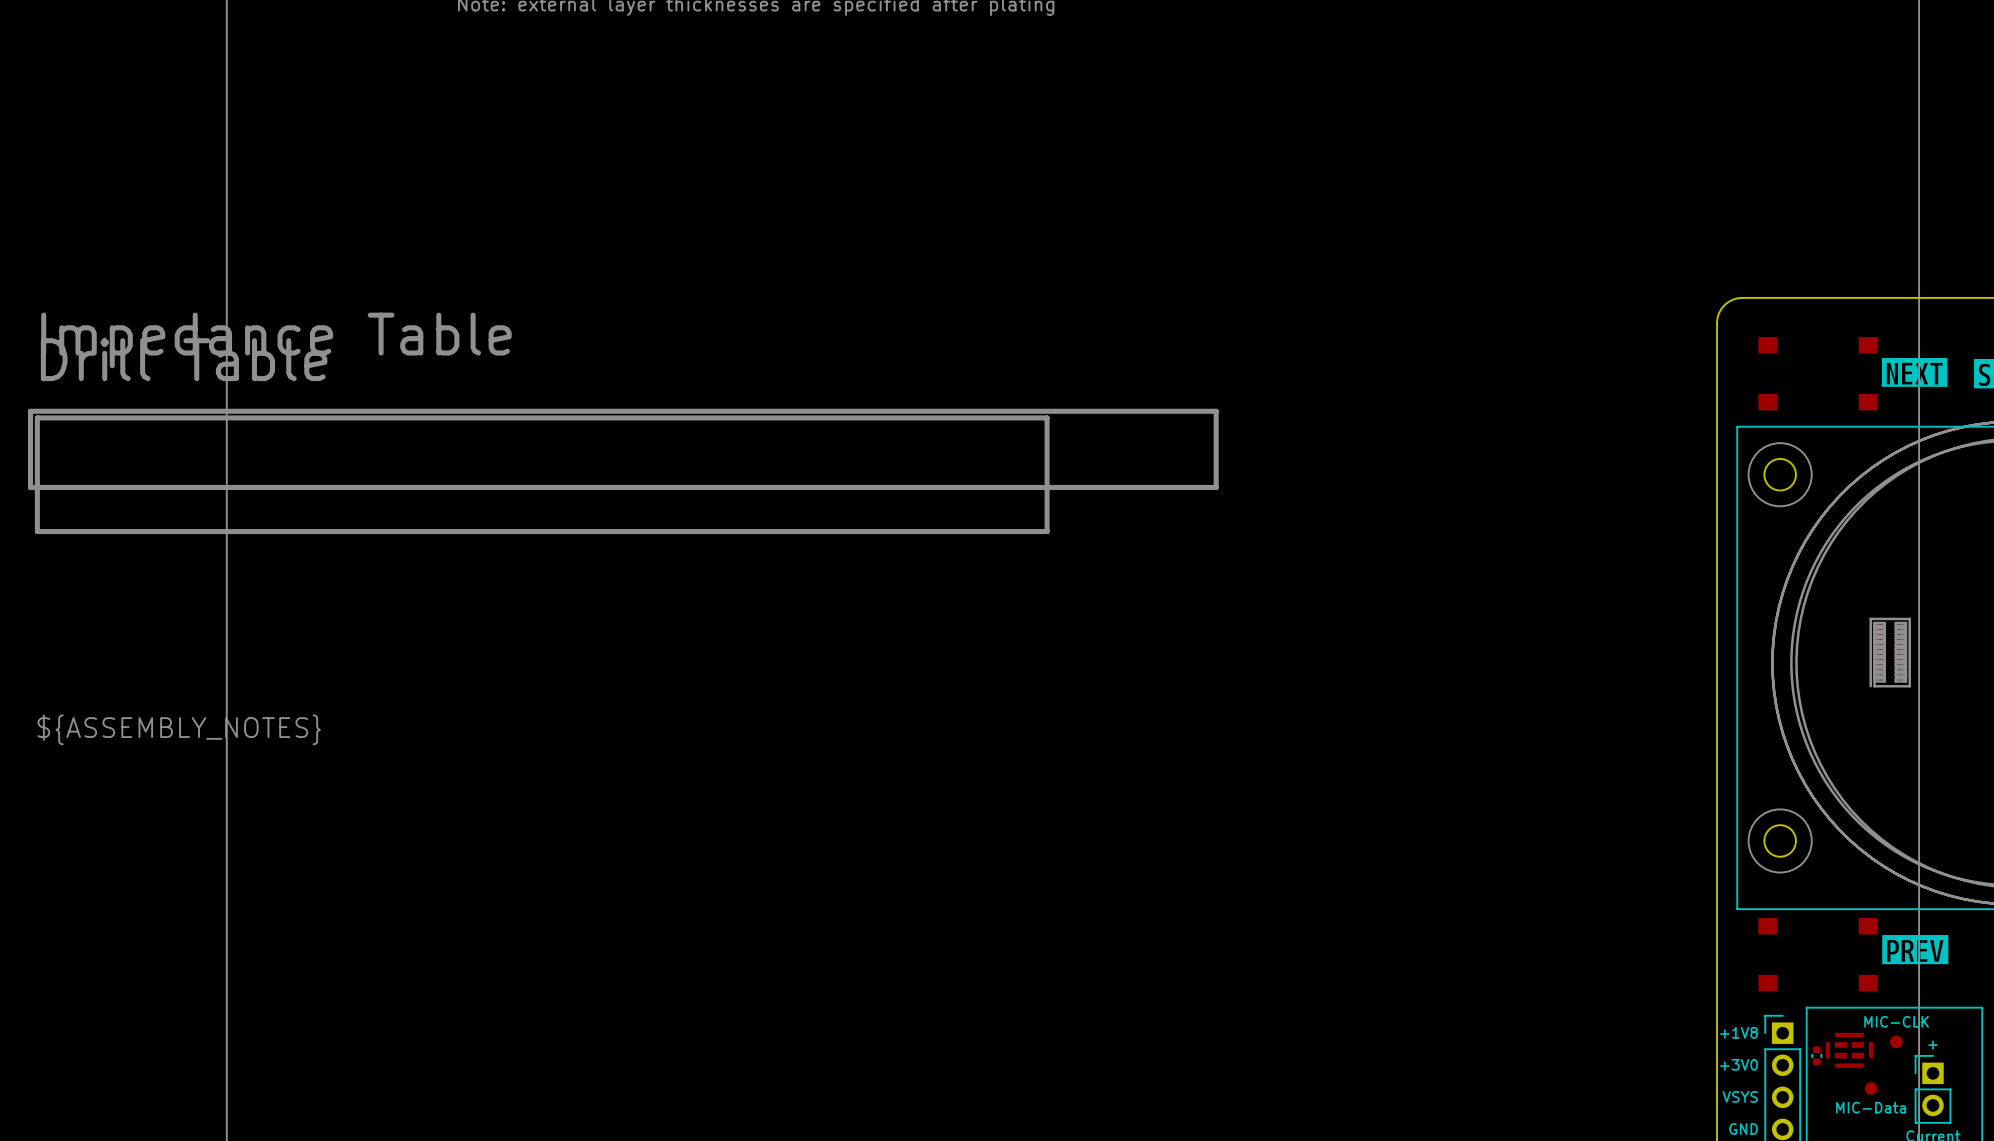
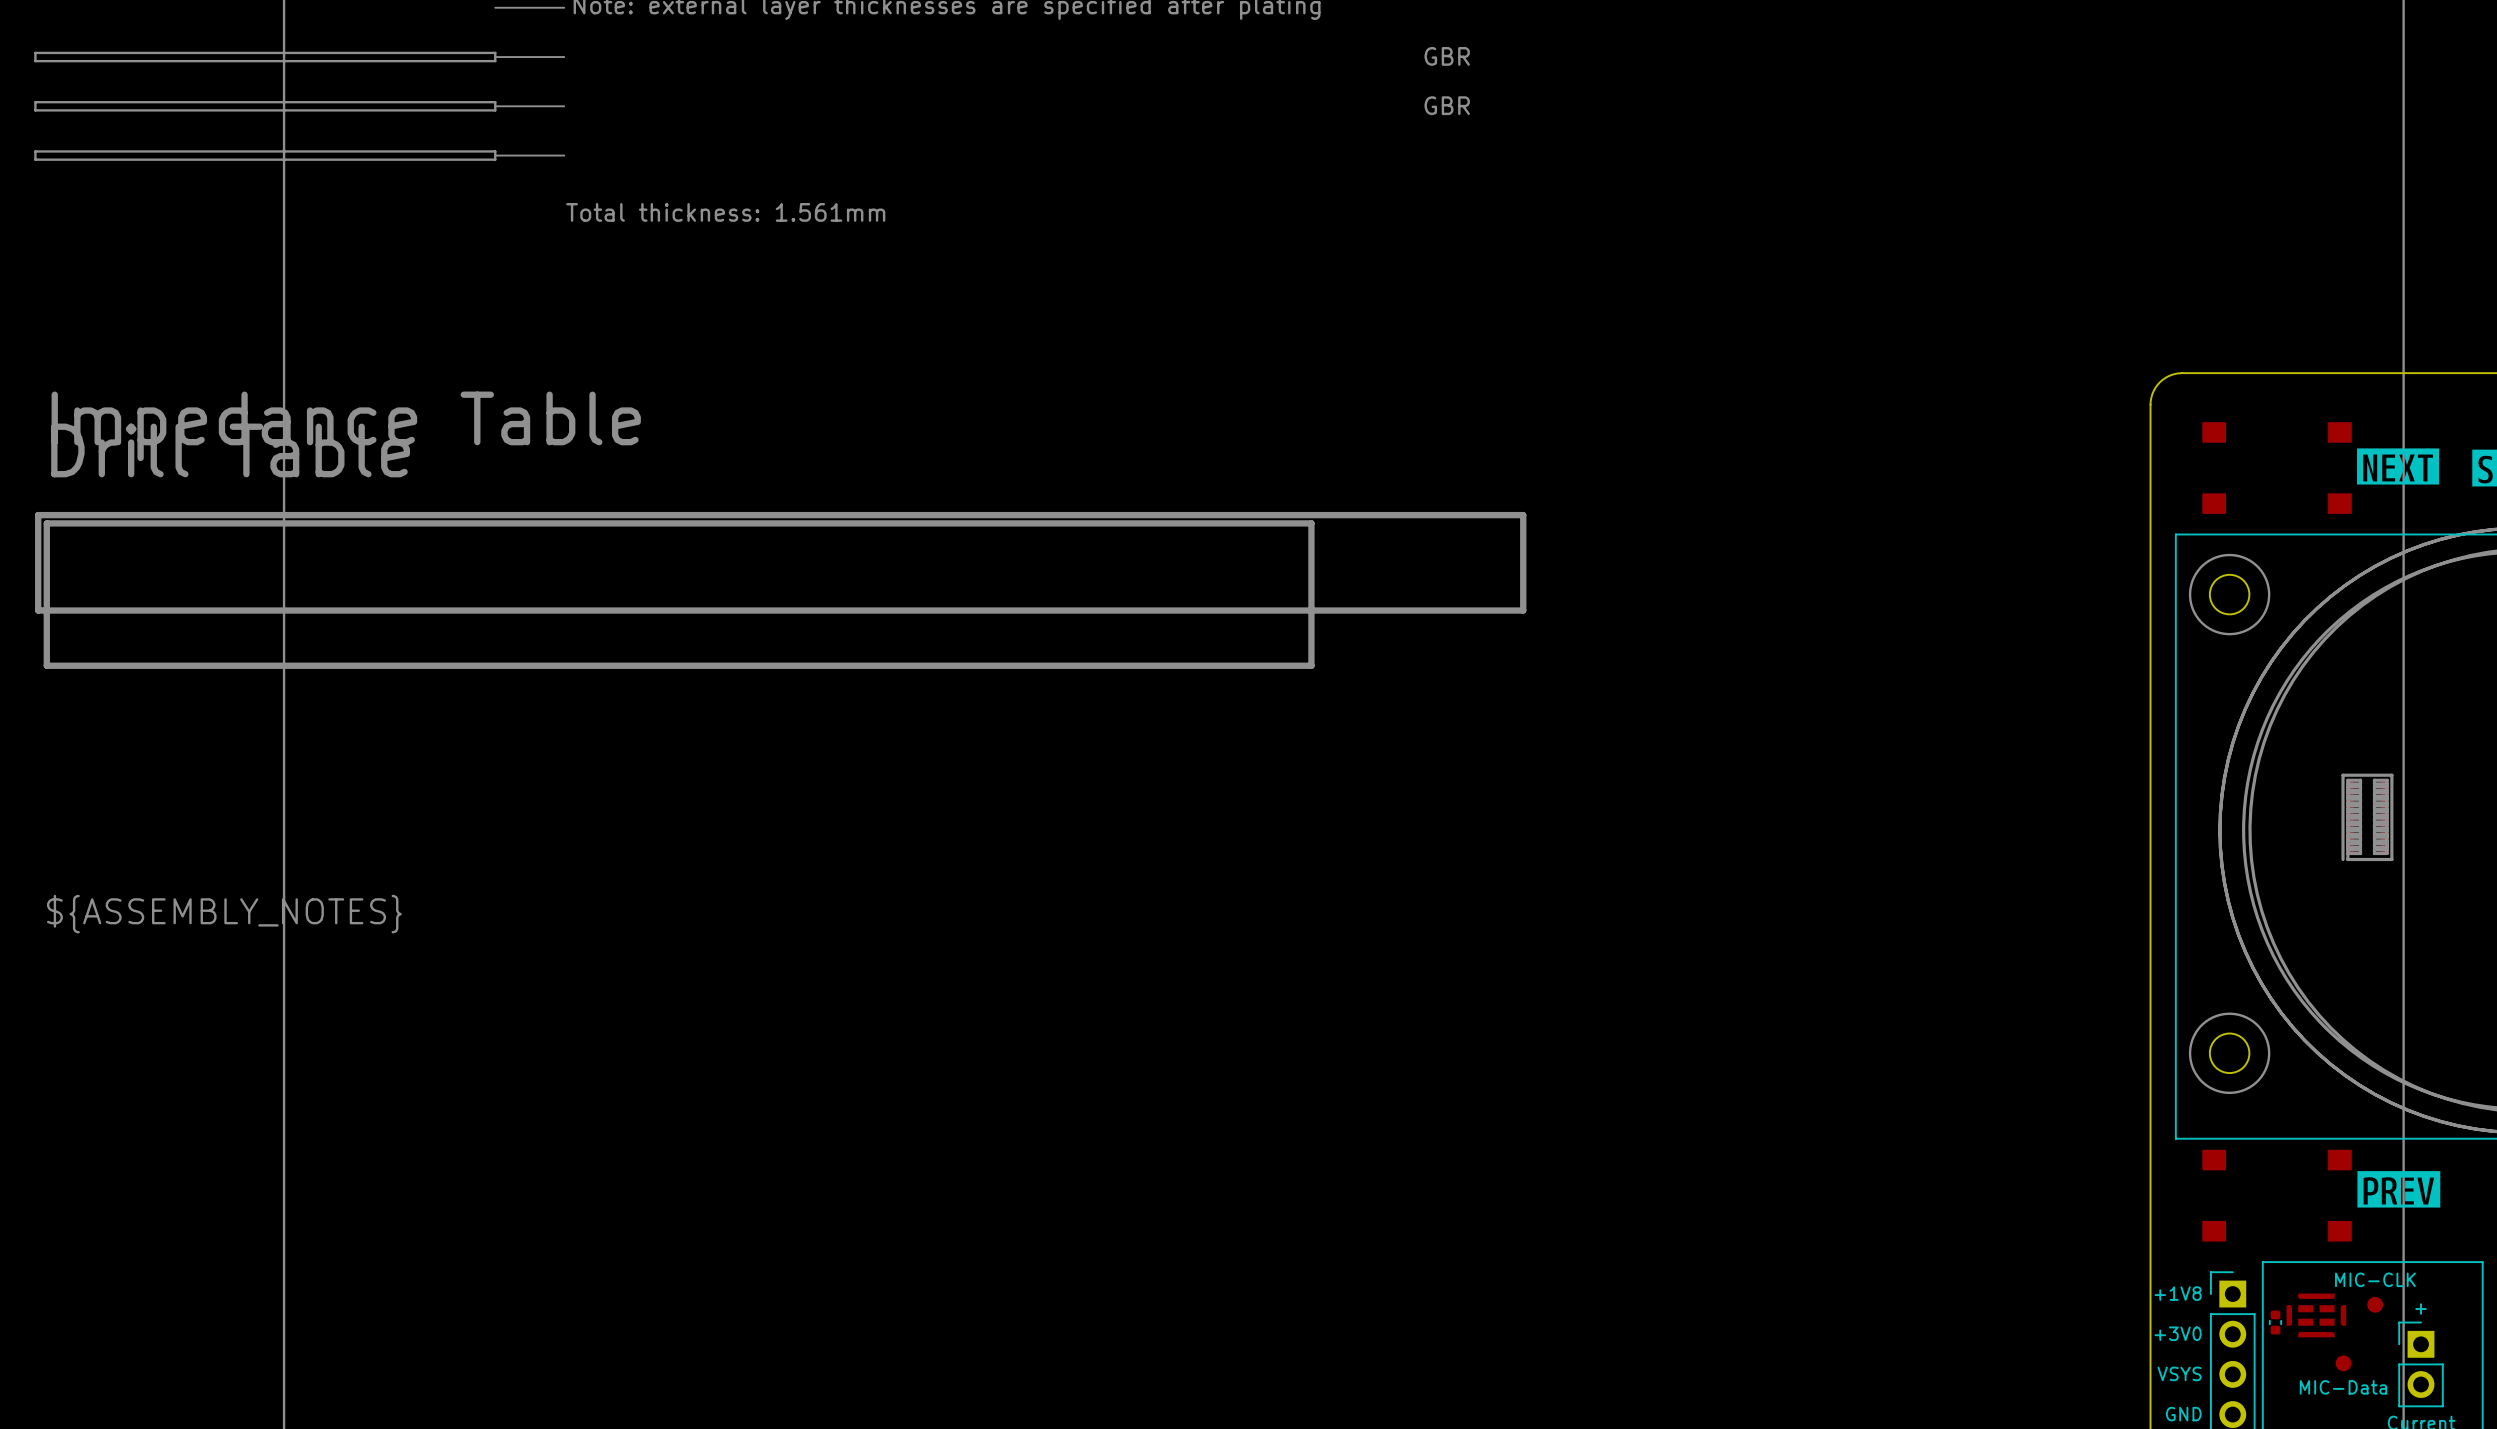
line: none -> (495, 7) (564, 7)
line: none -> (35, 52) (35, 61) (495, 61) (495, 52) (35, 52)
line: none -> (495, 57) (564, 57)
text: none -> GBR (1447, 56)
line: none -> (35, 102) (35, 110) (495, 110) (495, 102) (35, 102)
line: none -> (495, 106) (564, 106)
text: none -> GBR (1447, 105)
line: none -> (35, 151) (35, 159) (495, 159) (495, 151) (35, 151)
line: none -> (495, 155) (564, 155)
text: none -> Total thickness: 1.561mm (725, 212)

